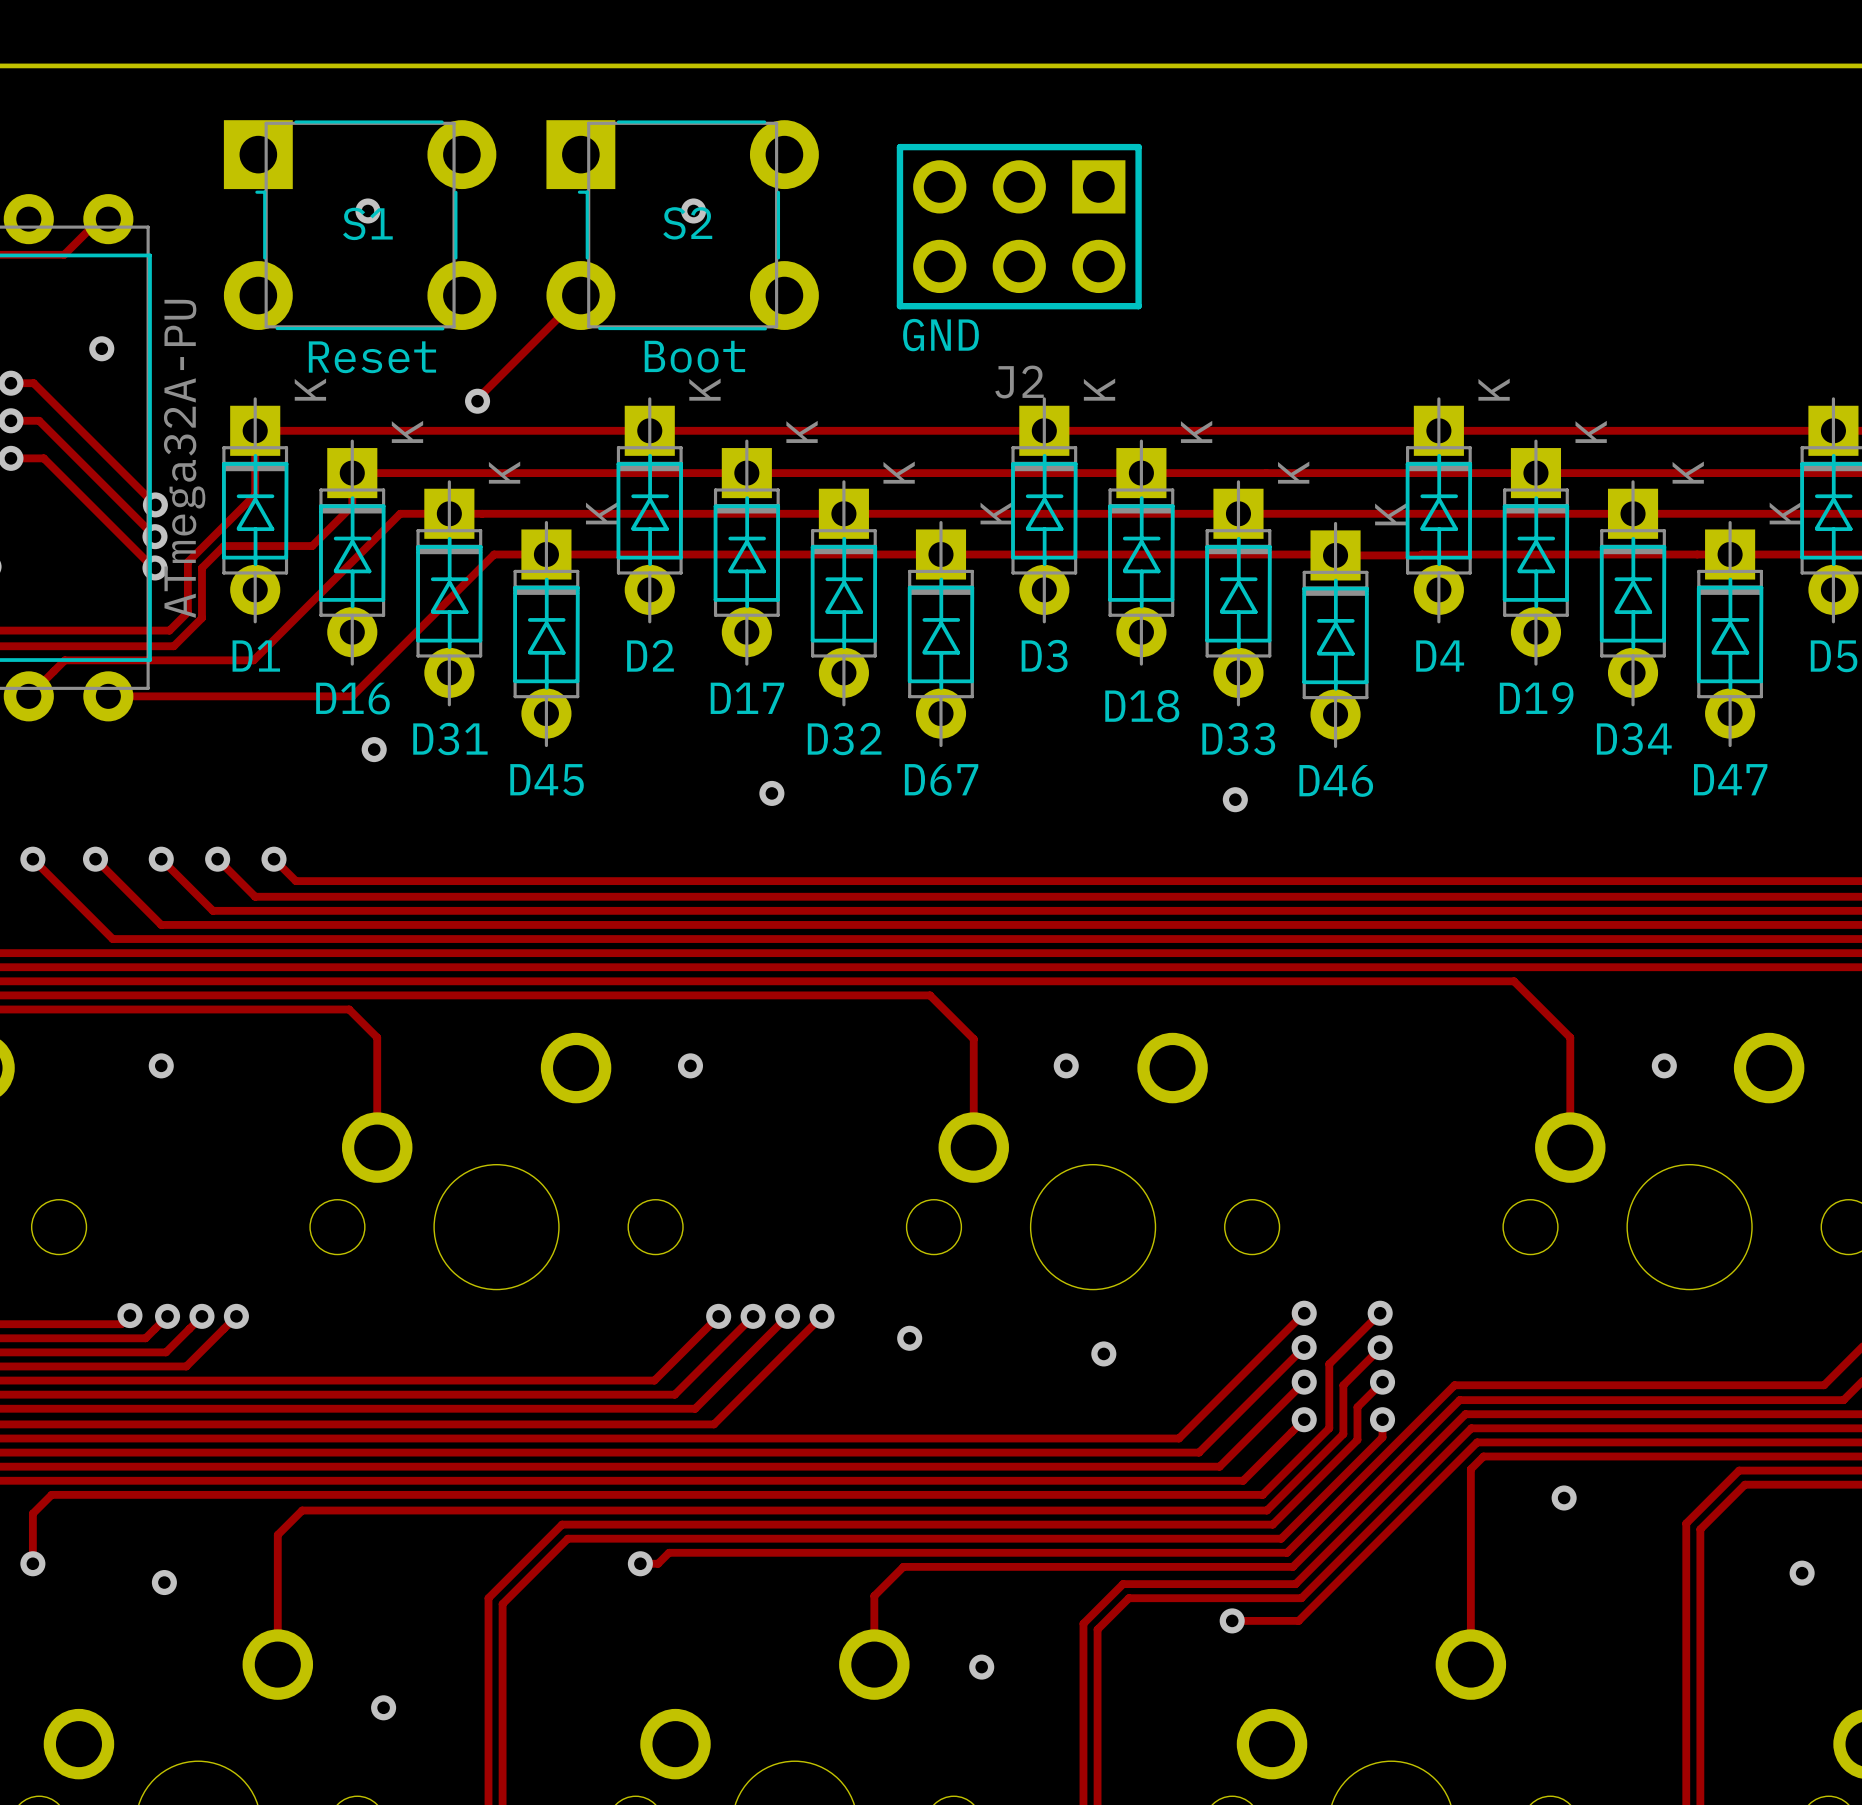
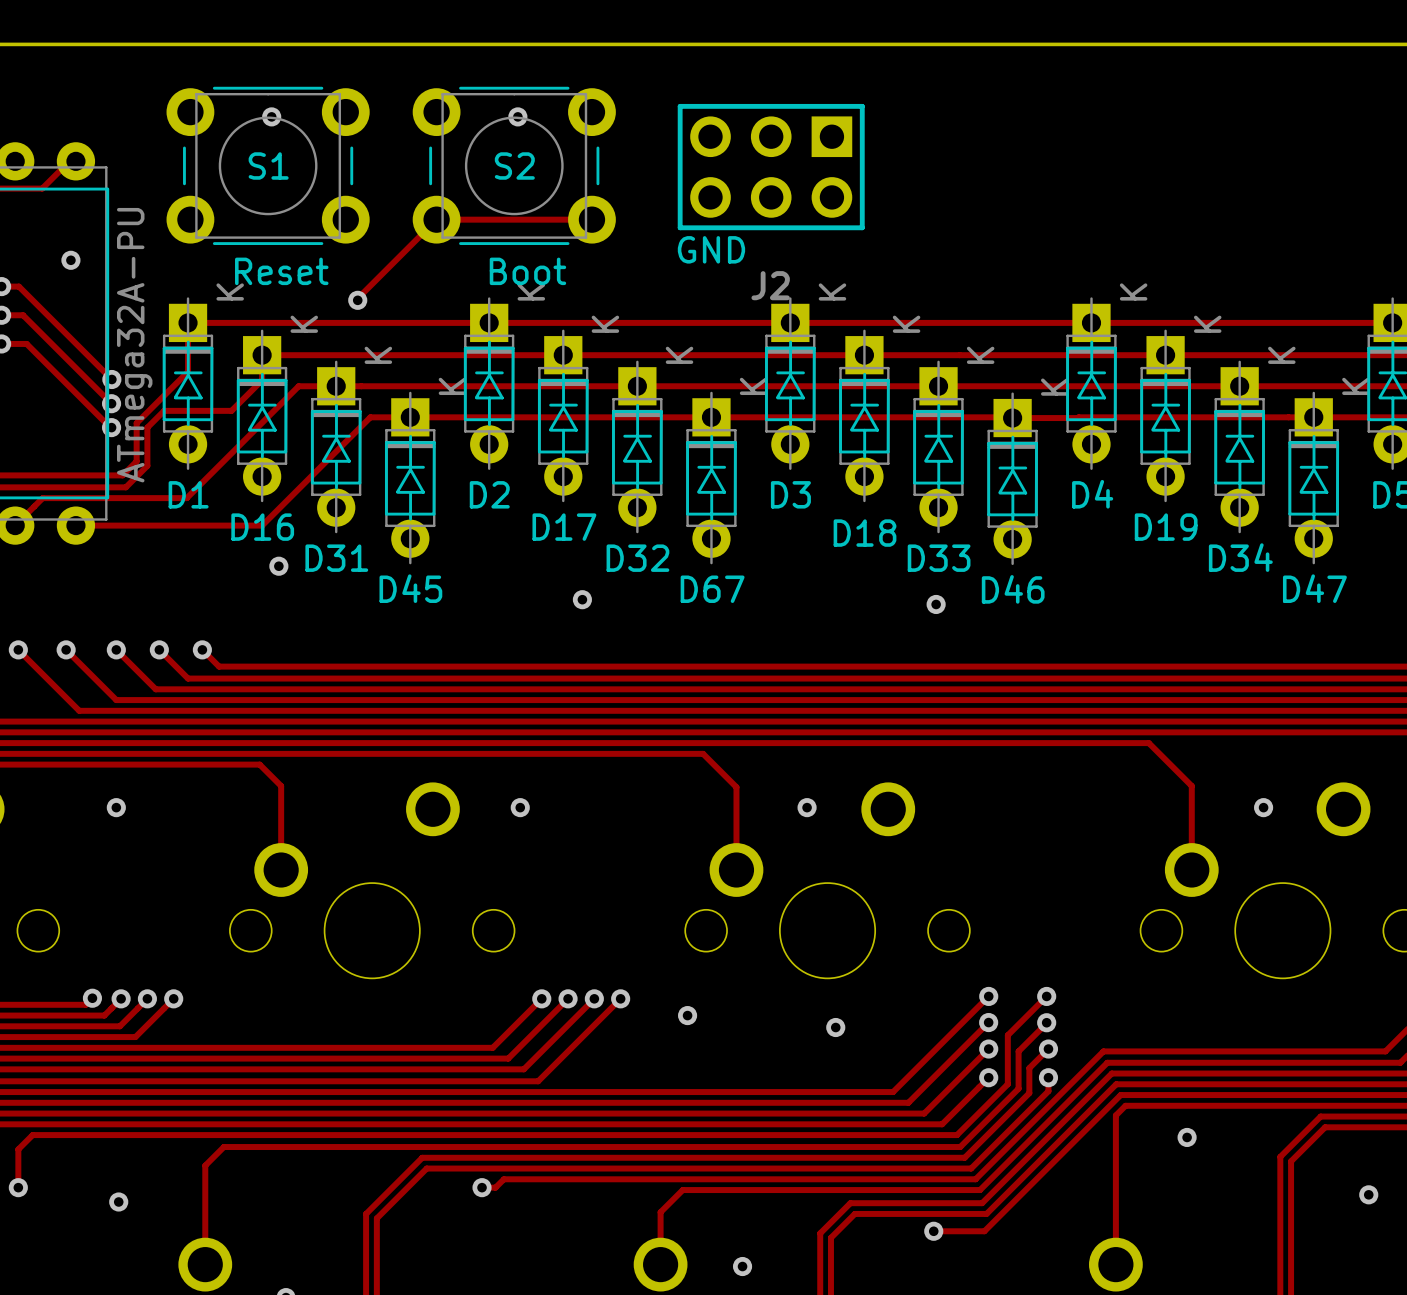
S1 footprint: [223, 120, 497, 331] -> [166, 86, 370, 246]
S2 footprint: [546, 120, 819, 331] -> [412, 86, 616, 246]
via position: (367, 210) -> (271, 116)
via position: (693, 210) -> (517, 116)
track: none -> (436, 219) (591, 219)

